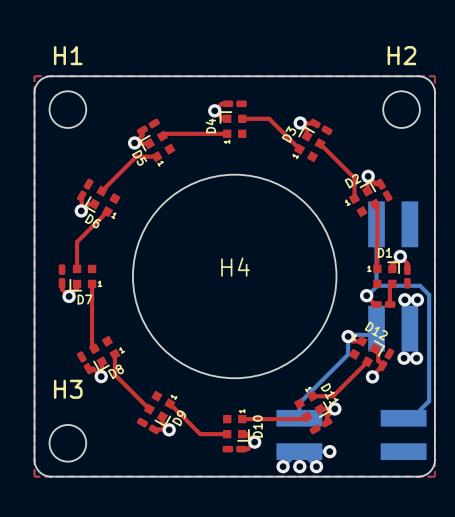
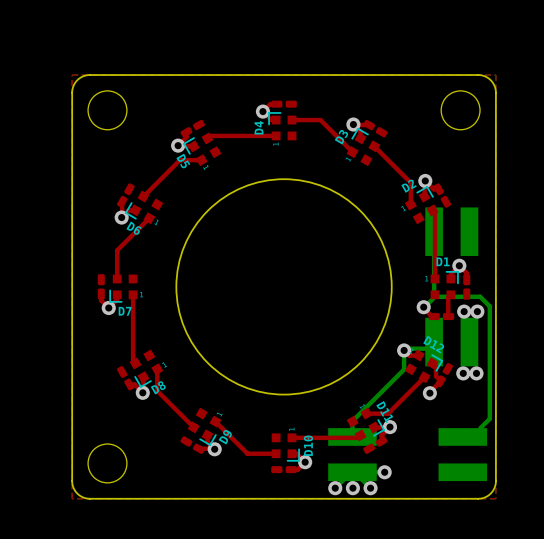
H1 name: H1 (68, 55) -> none
H2 name: H2 (401, 55) -> none
H4: (235, 267) -> none
H3 name: H3 (68, 389) -> none

